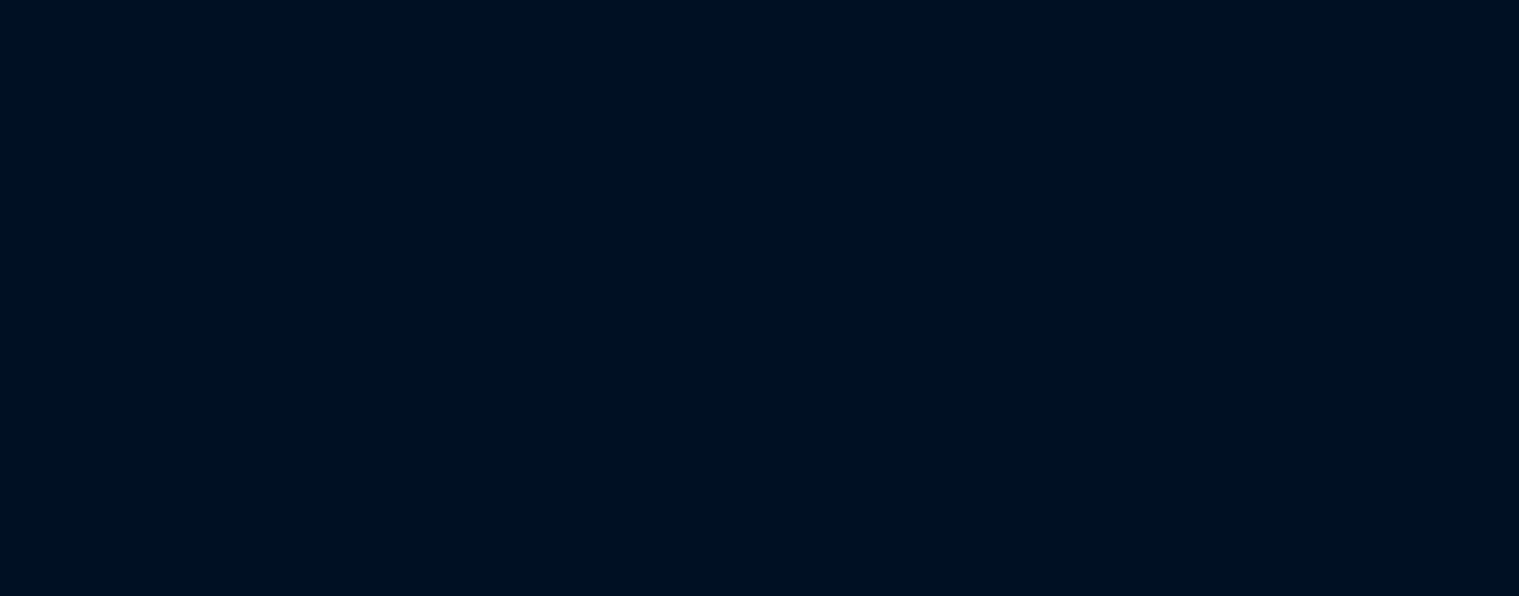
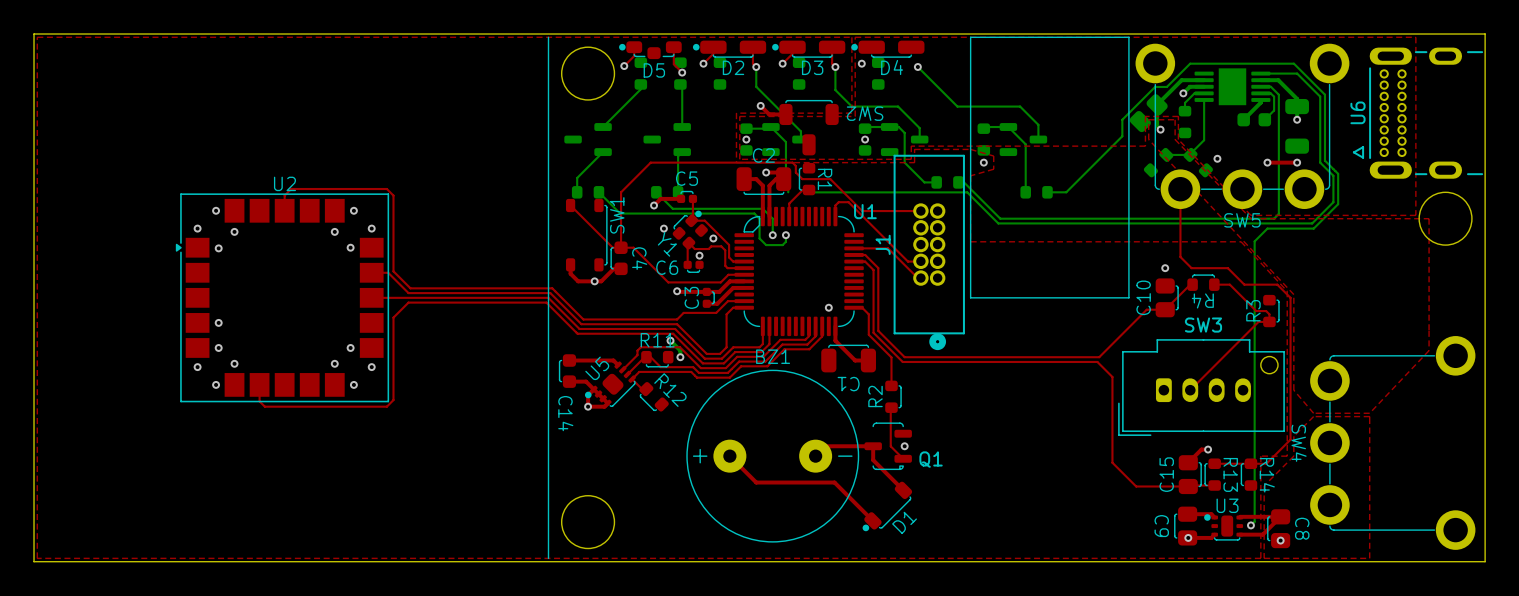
board edge: none -> (34, 34) (1485, 34) (1485, 561) (34, 561) (34, 34)
top zone outline: none -> (37, 37) (851, 37) (851, 113) (736, 113) (736, 162) (914, 162) (914, 149) (970, 149) (993, 156) (993, 169) (970, 175) (970, 241) (1241, 241) (1287, 291) (1287, 456) (1260, 456) (1260, 558) (37, 558) (37, 37)
line: none -> (548, 37) (548, 558)
top zone outline: none -> (855, 37) (1415, 37) (1415, 215) (1250, 215) (1178, 139) (1178, 116) (1145, 116) (1145, 146) (911, 146) (911, 159) (739, 159) (739, 116) (855, 116) (855, 37)
line: none -> (970, 37) (1128, 37) (1128, 297) (970, 297) (970, 37)
round board edge: none -> [561, 46, 616, 101]
top track: none -> (634, 47) (634, 56) (624, 66)
top track: none -> (673, 47) (673, 64) (682, 72)
top track: none -> (713, 47) (713, 53) (703, 63)
top track: none -> (752, 47) (752, 63) (756, 66)
top track: none -> (792, 47) (792, 53) (782, 63)
top track: none -> (832, 47) (832, 63) (835, 66)
D2: none -> (729, 49)
D3: none -> (808, 49)
D4: none -> (887, 49)
D5: none -> (650, 50)
via: none -> (703, 63)
via: none -> (782, 63)
via: none -> (861, 63)
via: none -> (624, 66)
bottom track: none -> (756, 66) (756, 86) (800, 131) (800, 139)
via: none -> (756, 66)
bottom track: none -> (835, 66) (835, 90) (851, 106) (898, 106) (919, 128) (919, 139)
via: none -> (835, 66)
bottom track: none -> (917, 66) (957, 106) (1020, 106) (1038, 124) (1038, 139)
via: none -> (917, 66)
via: none -> (682, 72)
part: none -> (640, 73)
part: none -> (680, 73)
part: none -> (719, 73)
part: none -> (799, 73)
part: none -> (878, 73)
bottom track: none -> (1260, 73) (1297, 73) (1320, 96) (1320, 162) (1333, 175) (1333, 202) (1312, 223) (998, 223) (967, 192) (810, 192)
bottom track: none -> (1204, 80) (1181, 80) (1157, 104) (1157, 126) (1160, 129)
bottom track: none -> (1260, 80) (1278, 80) (1297, 98) (1297, 119)
bottom track: none -> (640, 84) (640, 89) (603, 127)
bottom track: none -> (680, 84) (682, 86) (682, 127)
bottom track: none -> (1204, 86) (1189, 86) (1183, 93)
part: none -> (1232, 86)
bottom track: none -> (1260, 86) (1270, 86) (1278, 94) (1278, 213) (1274, 218) (1000, 218) (964, 182) (958, 182)
via: none -> (1183, 93)
bottom track: none -> (1204, 93) (1194, 93) (1185, 102) (1185, 111)
bottom track: none -> (1260, 93) (1270, 93) (1274, 96) (1274, 110) (1264, 119)
bottom track: none -> (1204, 99) (1204, 140) (1190, 154) (1166, 154)
bottom track: none -> (1260, 99) (1260, 102) (1243, 119)
top track: none -> (760, 105) (769, 114) (785, 114)
via: none -> (760, 105)
part: none -> (1148, 113)
U6: none -> (1418, 113)
top zone outline: none -> (1148, 119) (1175, 119) (1175, 139) (1250, 218) (1429, 218) (1429, 350) (1369, 413) (1313, 413) (1293, 390) (1293, 294) (1148, 139) (1148, 119)
part: none -> (1254, 119)
via: none -> (1297, 119)
part: none -> (1185, 122)
SW5: none -> (1242, 126)
part: none -> (1297, 126)
SW2: none -> (809, 127)
bottom track: none -> (746, 128) (769, 128) (770, 127) (785, 142) (788, 192)
bottom track: none -> (865, 128) (866, 127) (898, 127) (904, 132) (904, 162) (924, 182) (936, 182)
bottom track: none -> (983, 128) (985, 127) (1008, 127) (1025, 144) (1025, 192)
via: none -> (1160, 129)
part: none -> (588, 139)
part: none -> (667, 139)
part: none -> (746, 139)
via: none -> (746, 139)
part: none -> (785, 139)
part: none -> (865, 139)
via: none -> (865, 139)
part: none -> (904, 139)
part: none -> (983, 139)
part: none -> (1023, 139)
bottom track: none -> (603, 152) (577, 177) (577, 192)
bottom track: none -> (682, 152) (678, 156) (678, 192)
via: none -> (1217, 158)
via: none -> (983, 162)
part: none -> (1158, 162)
part: none -> (1198, 162)
top track: none -> (1267, 162) (1297, 162)
via: none -> (1267, 162)
via: none -> (1297, 162)
top track: none -> (766, 172) (777, 172) (783, 179) (776, 179) (769, 185) (769, 216)
via: none -> (766, 172)
top track: none -> (744, 179) (756, 179) (762, 185) (762, 216)
R1: none -> (807, 179)
C2: none -> (763, 181)
part: none -> (947, 182)
top track: none -> (1180, 189) (1180, 257) (1191, 268) (1227, 268) (1244, 284) (1277, 284) (1290, 297) (1290, 439) (1266, 463) (1214, 463)
top track: none -> (809, 190) (802, 190) (789, 203) (789, 216)
round board edge: none -> [1418, 191, 1473, 246]
part: none -> (588, 192)
bottom track: none -> (598, 192) (620, 213) (754, 213) (759, 218) (759, 238) (766, 245) (782, 245) (785, 241) (785, 235)
bottom track: none -> (656, 192) (672, 208) (762, 208) (772, 218) (772, 235)
part: none -> (667, 192)
part: none -> (1036, 192)
bottom track: none -> (1047, 192) (1066, 192) (1122, 136) (1122, 119) (1155, 86) (1166, 86) (1190, 63) (1293, 63) (1324, 94) (1324, 160) (1338, 173) (1338, 204) (1313, 228) (1267, 228) (1254, 241) (1254, 521) (1250, 525)
C5: none -> (687, 196)
top track: none -> (681, 198) (660, 198) (654, 205)
top track: none -> (692, 198) (691, 220) (704, 220) (729, 244) (729, 257) (733, 261) (744, 261)
top track: none -> (570, 205) (612, 247) (633, 247) (668, 282) (720, 282) (728, 274) (744, 274)
via: none -> (654, 205)
via: none -> (216, 210)
top track: none -> (284, 210) (284, 195) (291, 189) (386, 189) (393, 195) (393, 271) (410, 288) (552, 288) (583, 319) (677, 319) (683, 312) (716, 312) (727, 301) (744, 301)
via: none -> (353, 210)
top track: none -> (920, 211) (862, 211) (830, 179) (802, 179) (795, 172) (795, 165) (792, 162) (650, 162) (621, 192) (621, 247)
top track: none -> (835, 216) (835, 205) (838, 202) (848, 202) (907, 261) (920, 261)
via: none -> (197, 228)
via: none -> (371, 228)
via: none -> (663, 228)
Y1: none -> (690, 230)
via: none -> (234, 231)
via: none -> (334, 231)
SW1: none -> (586, 235)
via: none -> (772, 235)
via: none -> (785, 235)
via: none -> (713, 238)
via: none -> (350, 247)
via: none -> (218, 248)
top track: none -> (854, 248) (888, 248) (917, 278) (920, 278)
J1: none -> (929, 252)
top track: none -> (854, 254) (865, 254) (878, 268) (878, 330) (904, 357) (1099, 357) (1146, 309) (1165, 309) (1190, 284) (1192, 284)
via: none -> (699, 255)
C4: none -> (619, 258)
top track: none -> (854, 261) (865, 261) (873, 270) (873, 332) (902, 361) (1097, 361) (1112, 377) (1112, 462) (1136, 486) (1214, 485)
top track: none -> (570, 264) (570, 273) (578, 281) (601, 281) (613, 268) (621, 268)
top track: none -> (687, 264) (688, 243) (694, 249) (721, 246) (725, 250) (725, 265) (727, 268) (744, 268)
C6: none -> (693, 266)
via: none -> (1165, 268)
U1: none -> (799, 271)
top track: none -> (371, 272) (388, 272) (408, 293) (550, 293) (581, 324) (677, 324) (706, 353) (719, 353) (726, 347) (726, 314) (733, 307) (744, 307)
via: none -> (594, 281)
top track: none -> (744, 281) (729, 281) (719, 291) (677, 291)
R4: none -> (1203, 282)
top track: none -> (1214, 284) (1229, 284) (1256, 311) (1266, 311) (1269, 314) (1269, 321) (1258, 321) (1190, 390)
top track: none -> (744, 287) (733, 287) (717, 303) (706, 303)
via: none -> (677, 291)
U2: none -> (282, 297)
top track: none -> (371, 297) (548, 297) (579, 328) (675, 328) (704, 358) (721, 358) (733, 347) (759, 347) (762, 344) (762, 326)
C3: none -> (708, 297)
C10: none -> (1167, 297)
via: none -> (828, 307)
top track: none -> (854, 307) (862, 307) (868, 314) (868, 334) (891, 357) (891, 385)
R3: none -> (1271, 311)
via: none -> (218, 322)
top track: none -> (769, 326) (769, 344) (761, 352) (735, 352) (723, 363) (702, 363) (673, 333) (577, 333) (546, 302) (408, 302) (393, 317) (393, 400) (386, 406) (264, 406) (259, 401) (259, 384)
top track: none -> (809, 326) (809, 336) (805, 339) (780, 339) (763, 356) (737, 356) (725, 368) (700, 368) (679, 347) (640, 347) (637, 350) (637, 355) (622, 369)
top track: none -> (815, 326) (815, 336) (807, 344) (782, 344) (765, 361) (739, 361) (727, 372) (698, 372) (693, 367) (660, 367) (650, 357) (644, 357) (627, 374)
top track: none -> (822, 326) (822, 336) (809, 349) (784, 349) (767, 366) (741, 366) (729, 377) (696, 377) (691, 371) (639, 371) (632, 379) (642, 389) (646, 389)
top track: none -> (835, 326) (835, 340) (855, 360) (868, 360)
bottom track: none -> (670, 340) (680, 350) (680, 357)
via: none -> (670, 340)
via: none -> (218, 347)
via: none -> (350, 347)
via: none -> (680, 357)
C1: none -> (848, 358)
R11: none -> (657, 359)
top track: none -> (569, 360) (613, 360) (618, 365)
via: none -> (234, 363)
via: none -> (334, 363)
via: none -> (197, 367)
via: none -> (371, 367)
C14: none -> (567, 371)
top track: none -> (569, 381) (586, 381) (607, 403) (604, 406) (588, 406) (588, 395) (593, 389)
via: none -> (216, 384)
via: none -> (353, 384)
U5: none -> (610, 384)
SW3: none -> (1201, 387)
R12: none -> (654, 396)
R2: none -> (893, 396)
via: none -> (588, 406)
top track: none -> (891, 407) (890, 446) (903, 458)
top zone outline: none -> (1313, 416) (1293, 436) (1293, 456) (1264, 485) (1264, 558) (1369, 558) (1369, 416) (1313, 416)
SW4: none -> (1392, 442)
Q1: none -> (888, 446)
via: none -> (904, 446)
top track: none -> (1208, 449) (1201, 449) (1188, 462)
via: none -> (1208, 449)
top track: none -> (729, 456) (756, 482) (834, 482) (872, 520)
BZ1: none -> (772, 456)
top track: none -> (815, 456) (825, 446) (873, 446) (873, 460) (903, 490)
C15: none -> (1190, 474)
R13: none -> (1212, 474)
R14: none -> (1248, 474)
round board edge: none -> [561, 495, 616, 550]
D1: none -> (887, 506)
top track: none -> (1187, 514) (1211, 514) (1214, 517)
top track: none -> (1239, 517) (1280, 516) (1262, 534) (1239, 534)
via: none -> (1250, 525)
C9: none -> (1185, 526)
U3: none -> (1223, 527)
C8: none -> (1278, 528)
top track: none -> (1214, 534) (1211, 537) (1187, 537)
via: none -> (1188, 537)
via: none -> (1280, 540)

